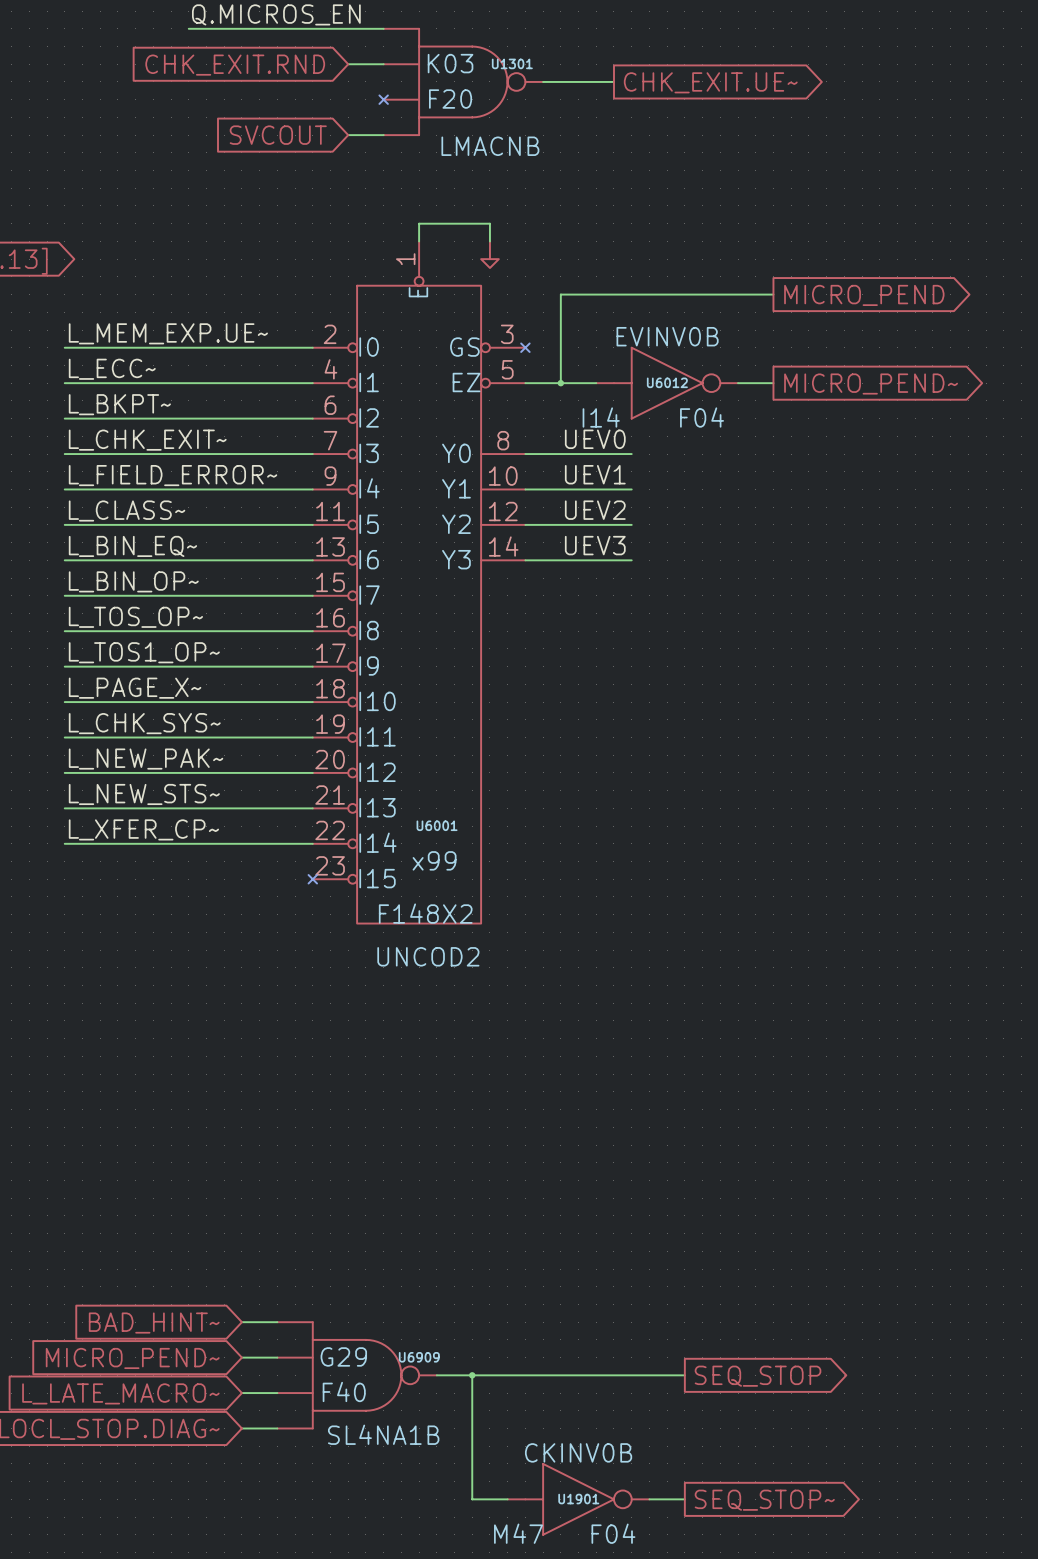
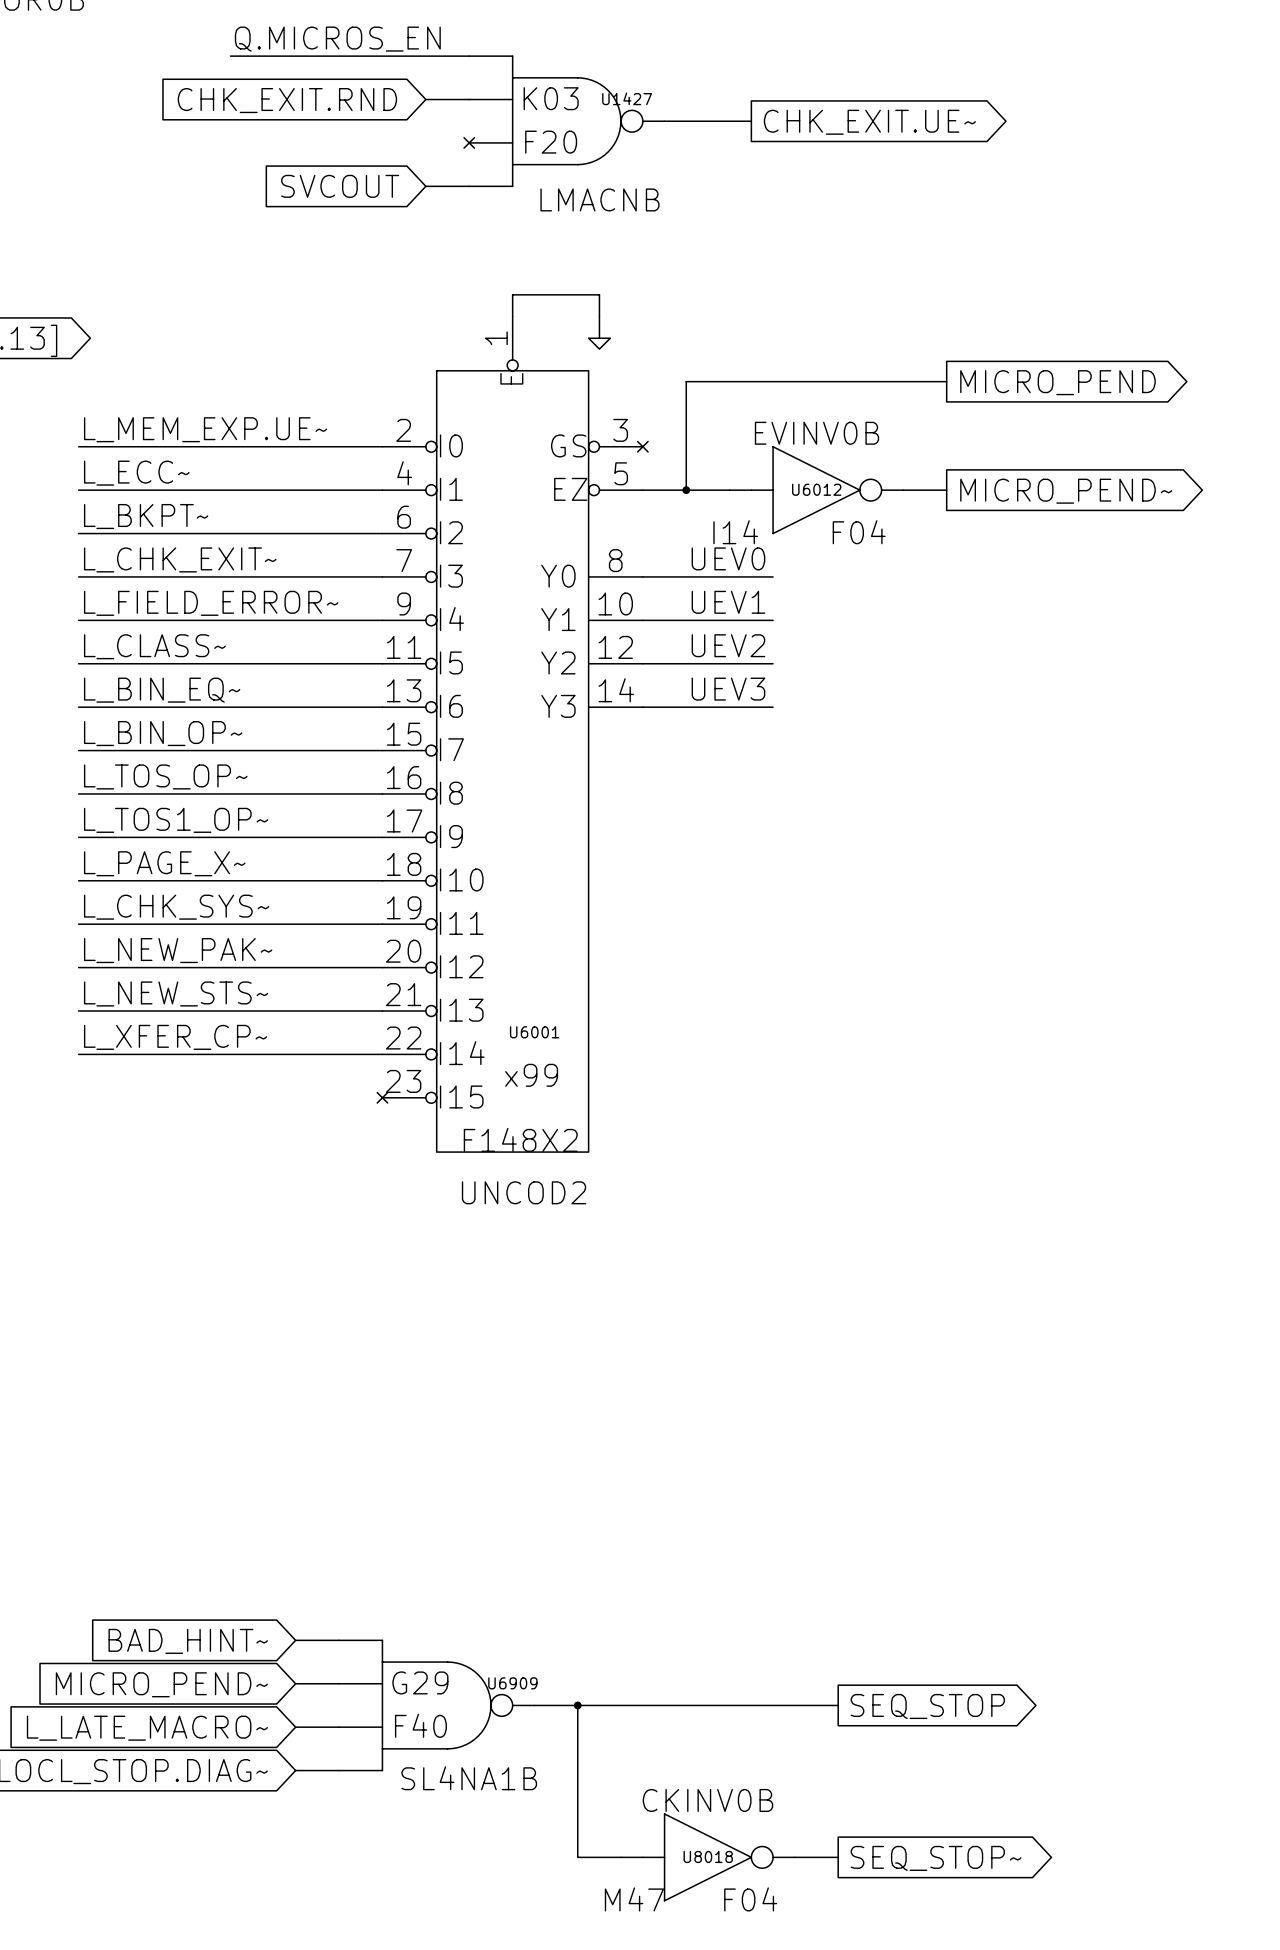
U1301 name: U1301 (512, 63) -> U1427 (627, 98)
U1901 name: U1901 (578, 1499) -> U8018 (708, 1856)

